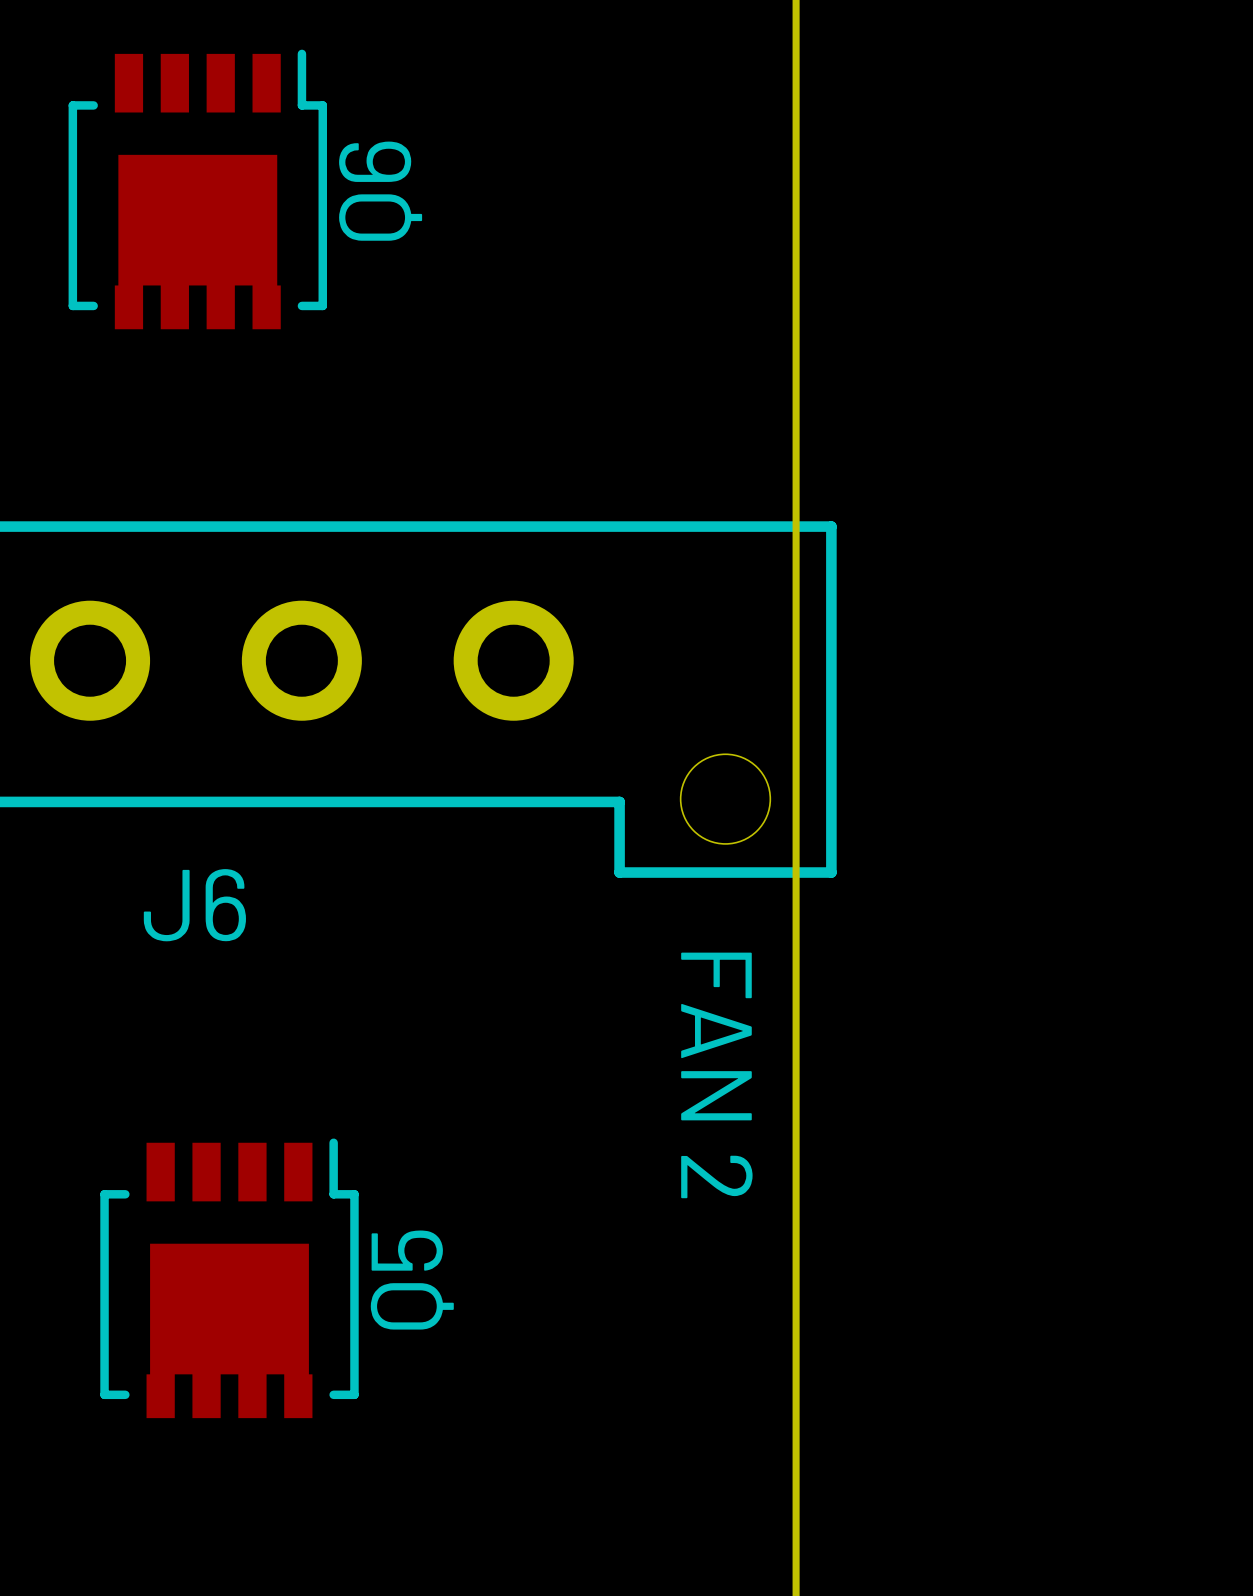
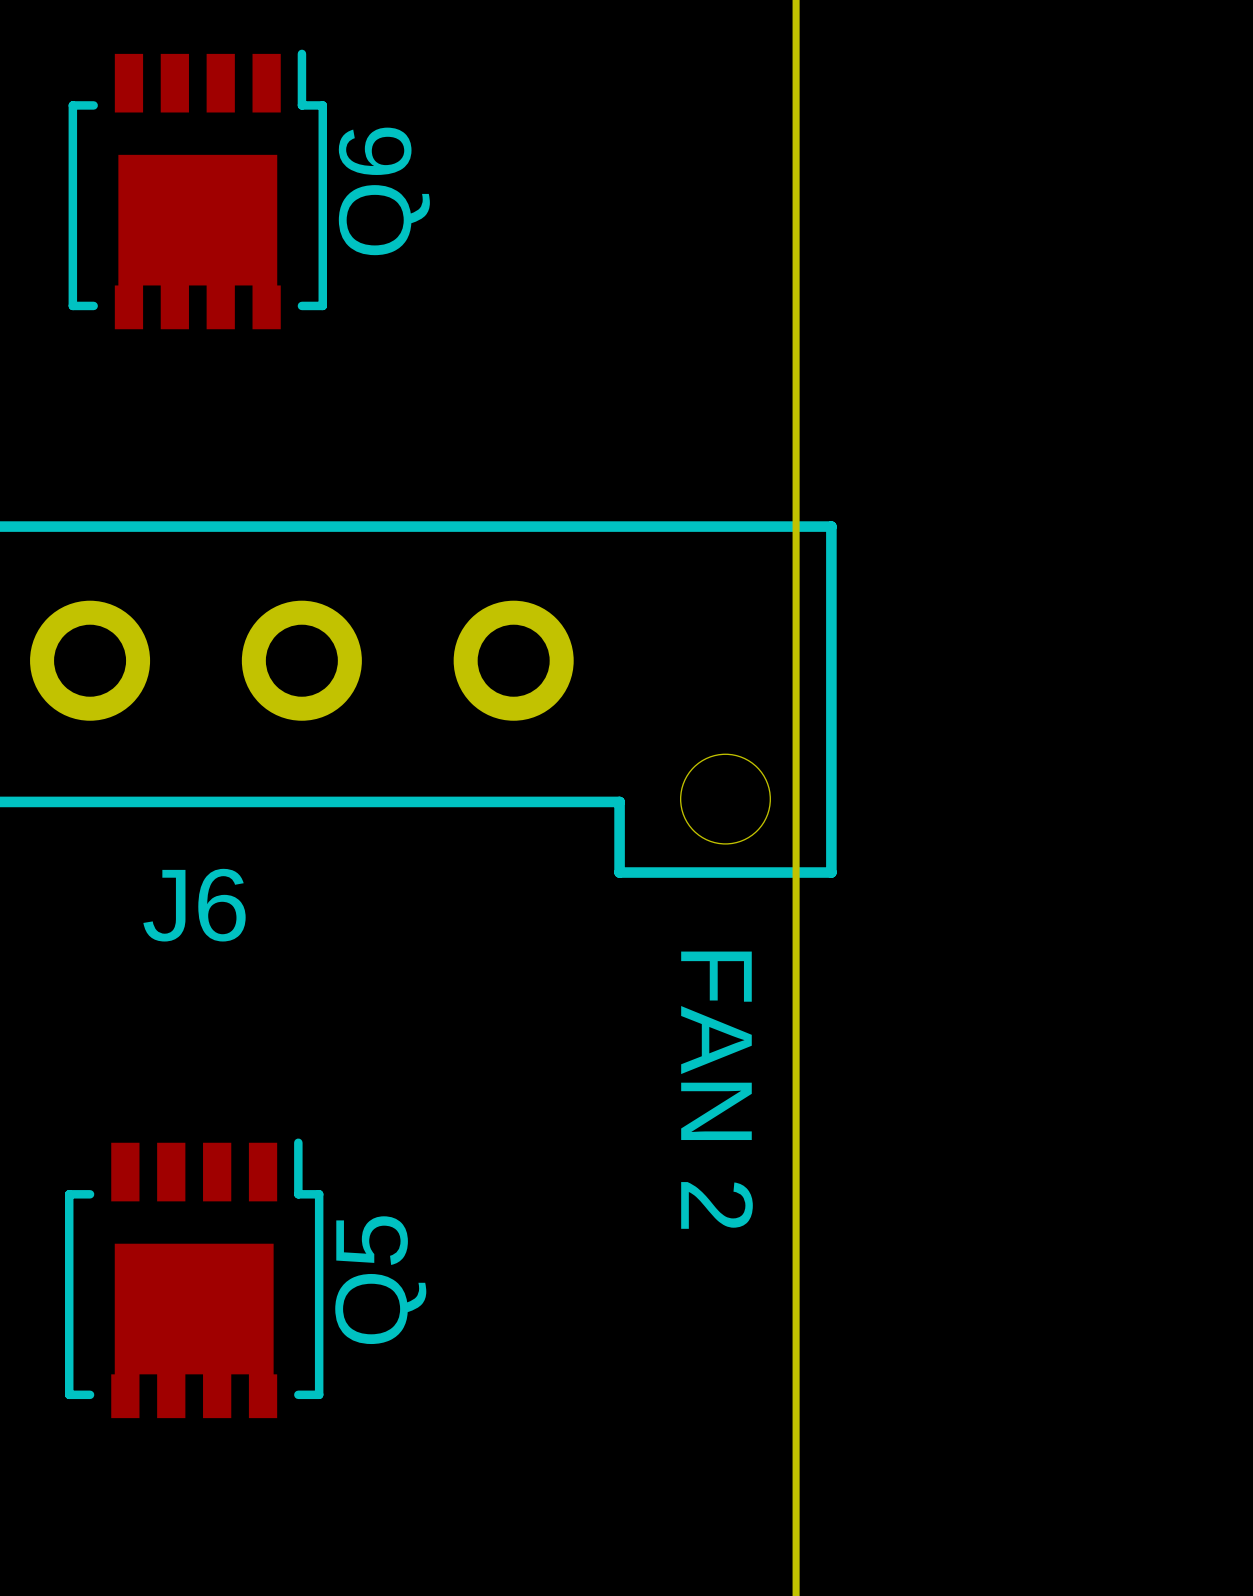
Q5 position: (229, 1278) -> (194, 1278)

